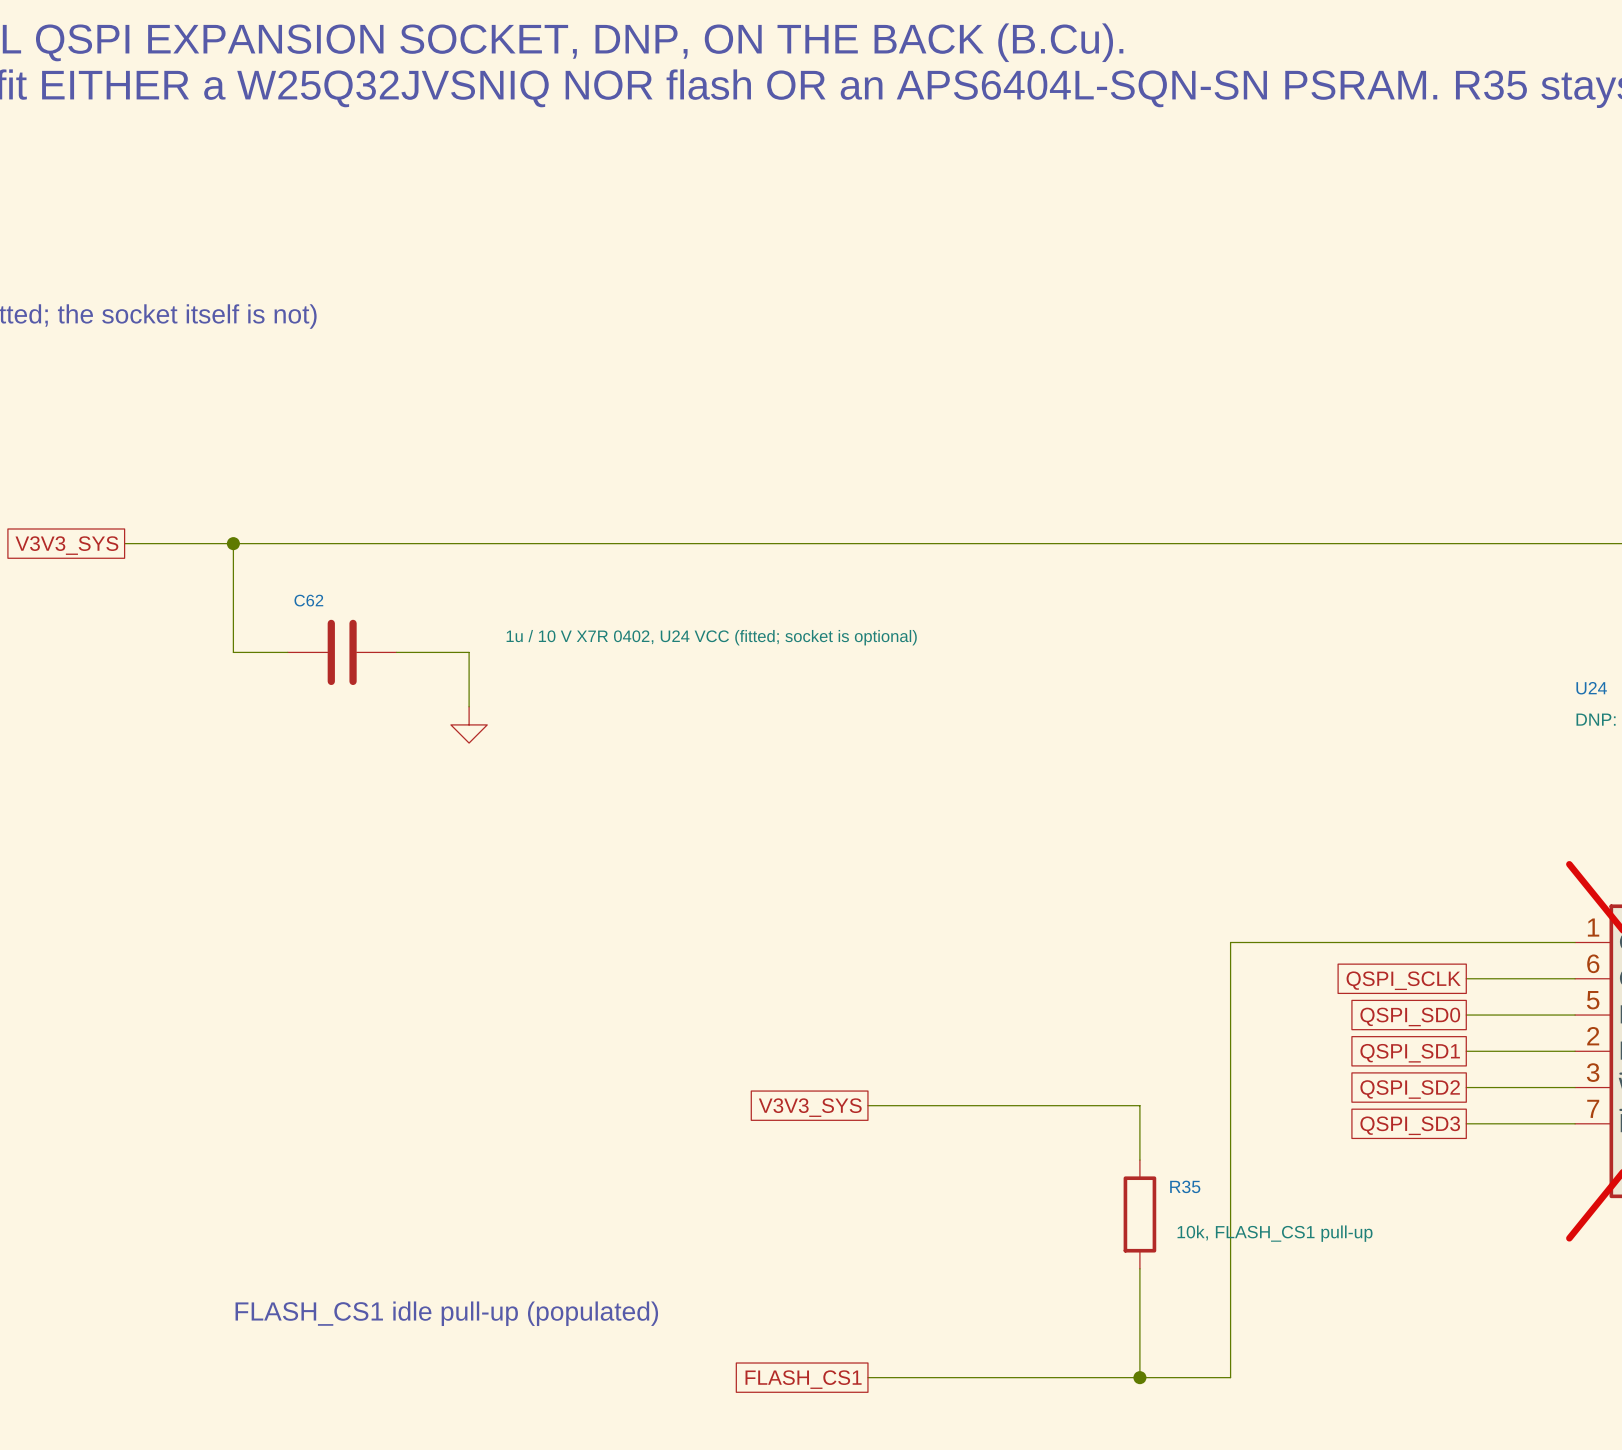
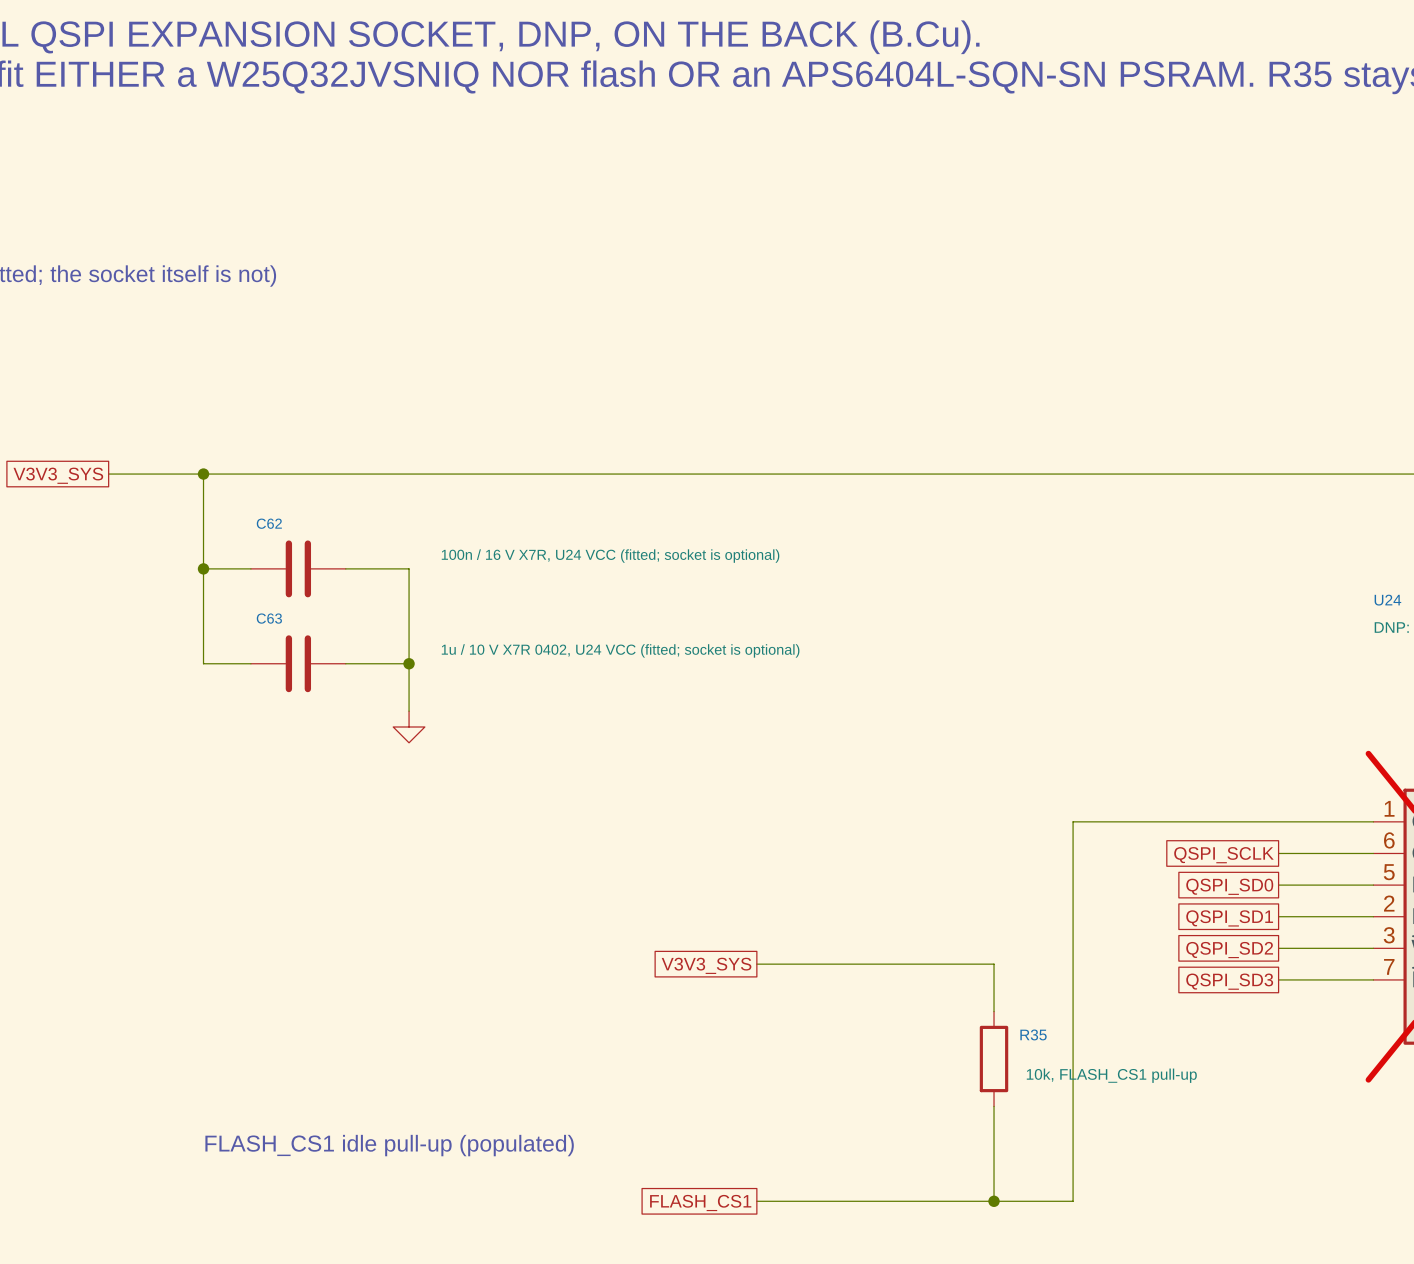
C62 value: 1u / 10 V X7R 0402, U24 VCC (fitted; socket is optional) (711, 637) -> 100n / 16 V X7R, U24 VCC (fitted; socket is optional) (610, 556)
wire: none -> (203, 568) (203, 663) (250, 663)
junction: none -> (203, 568)
wire: none -> (409, 616) (409, 711)
power symbol position: (469, 724) -> (409, 726)
C63: none -> 1u / 10 V X7R 0402, U24 VCC (fitted; socket is optional) (298, 663)
wire: none -> (345, 663) (409, 663)
junction: none -> (409, 663)

